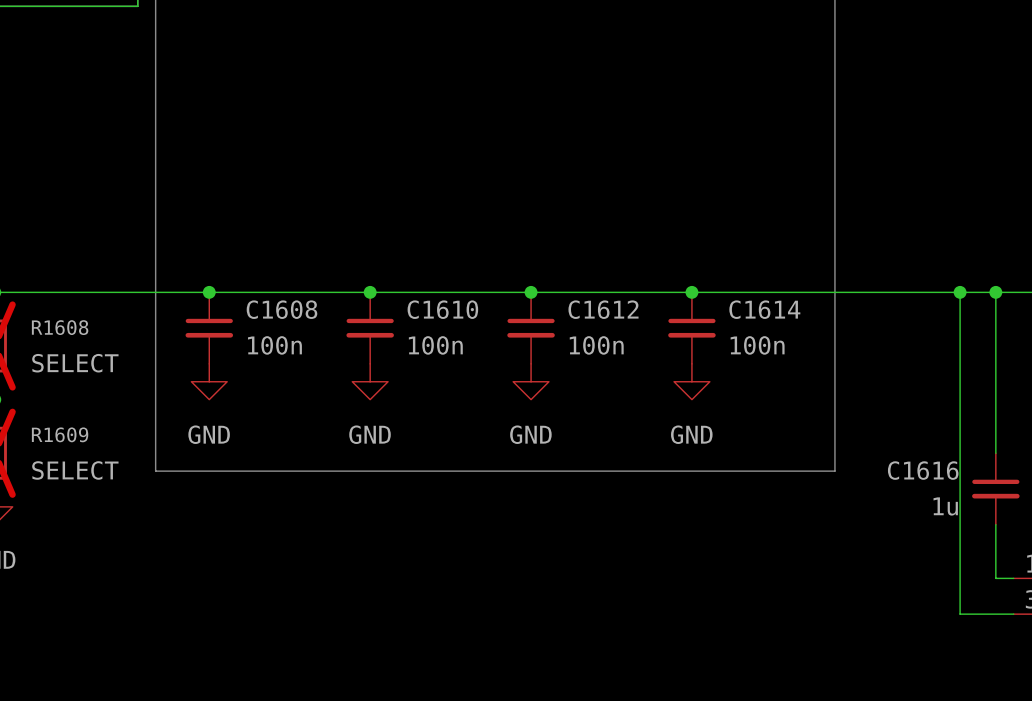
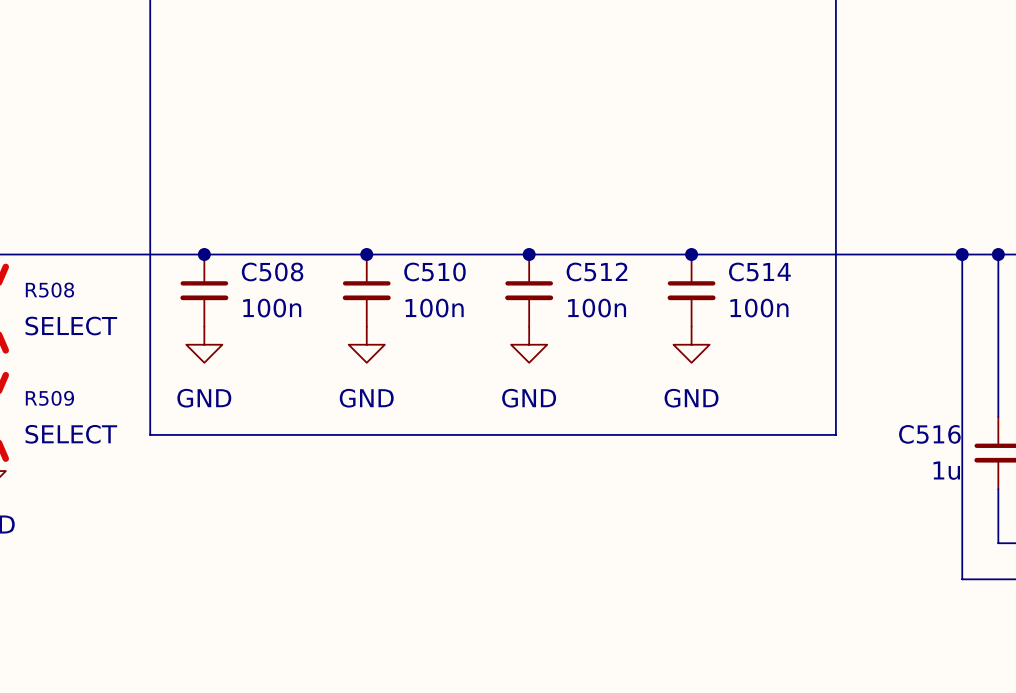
C1608 name: C1608 (281, 309) -> C508 (272, 271)
C1610 name: C1610 (442, 309) -> C510 (434, 271)
C1612 name: C1612 (603, 309) -> C512 (596, 271)
C1614 name: C1614 (764, 309) -> C514 (759, 271)
R1608 name: R1608 (60, 327) -> R508 (49, 290)
R1609 name: R1609 (60, 434) -> R509 (49, 398)
C1616 name: C1616 (923, 470) -> C516 (929, 434)

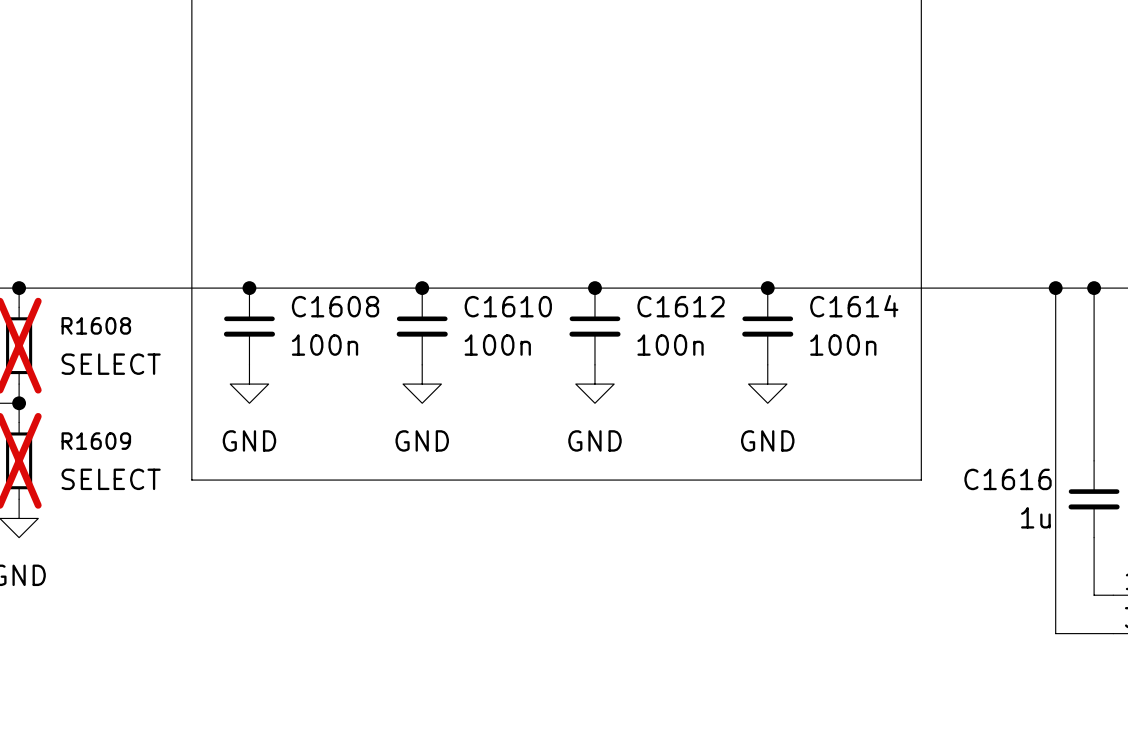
C508 name: C508 (272, 271) -> C1608 (335, 306)
C510 name: C510 (434, 271) -> C1610 (508, 306)
C512 name: C512 (596, 271) -> C1612 (681, 306)
C514 name: C514 (759, 271) -> C1614 (854, 306)
R508 name: R508 (49, 290) -> R1608 (96, 325)
R509 name: R509 (49, 398) -> R1609 (96, 441)
C516 name: C516 (929, 434) -> C1616 (1008, 479)

